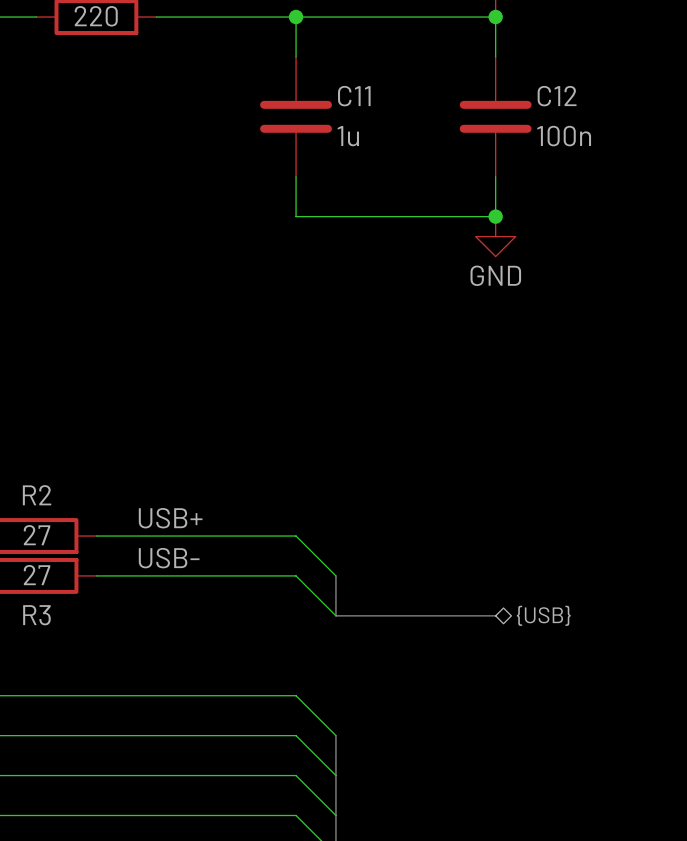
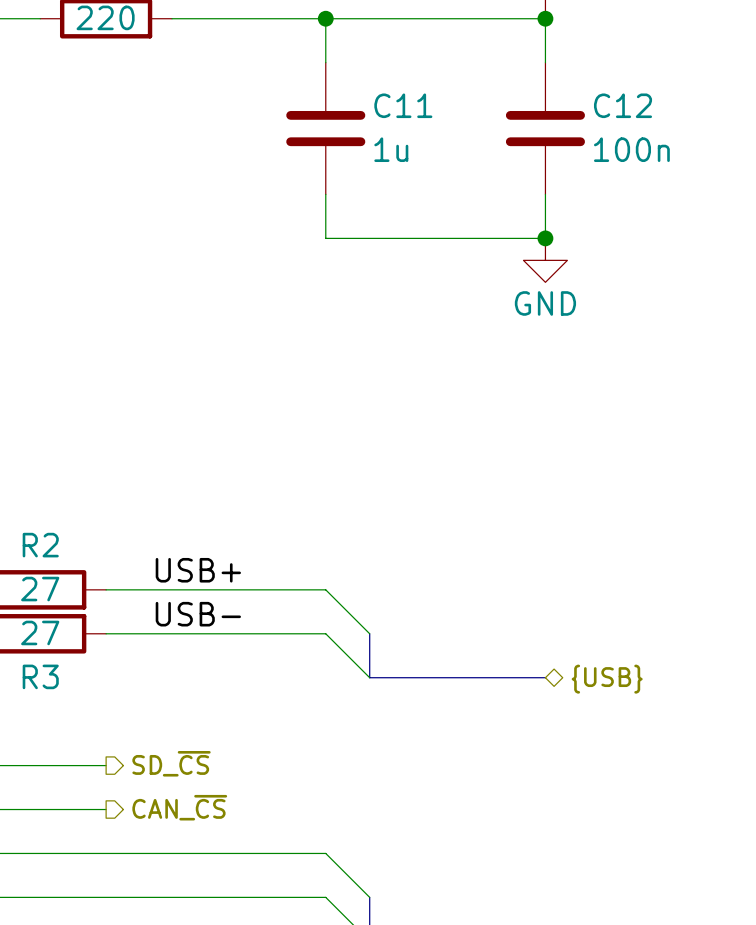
hierarchical label: none -> SD_~{CS} (171, 763)
wire: (96, 695) (296, 695) (335, 735) -> none
hierarchical label: none -> CAN_~{CS} (179, 807)
wire: (96, 735) (296, 735) (335, 775) -> none
bus: (335, 735) (335, 815) -> none

